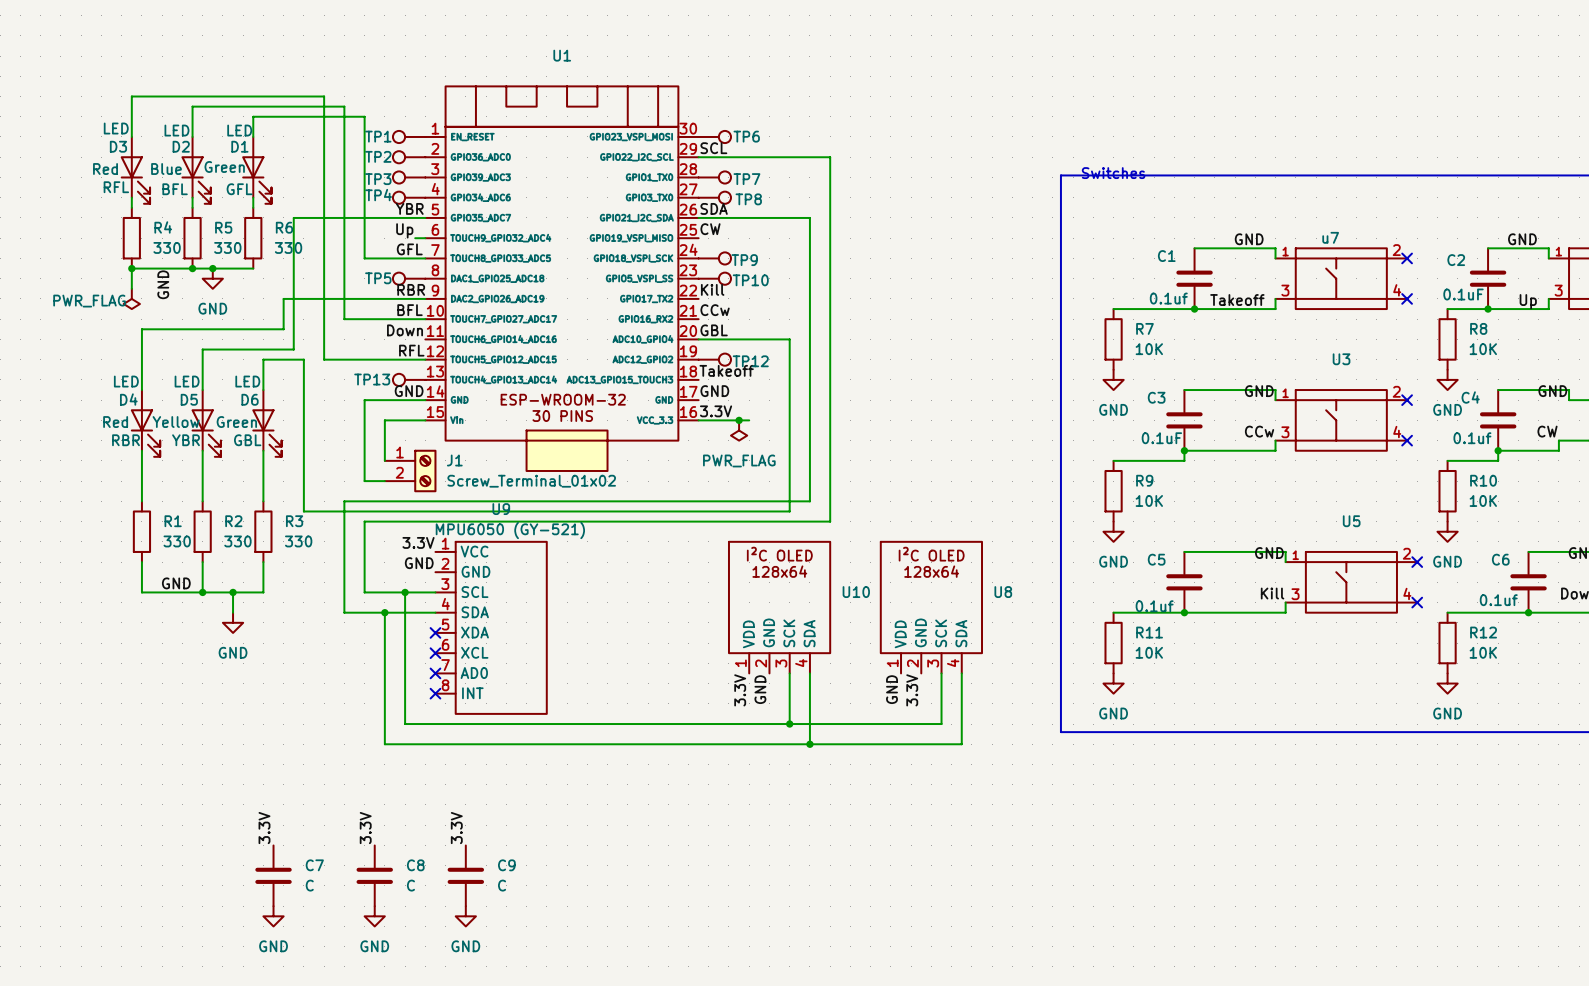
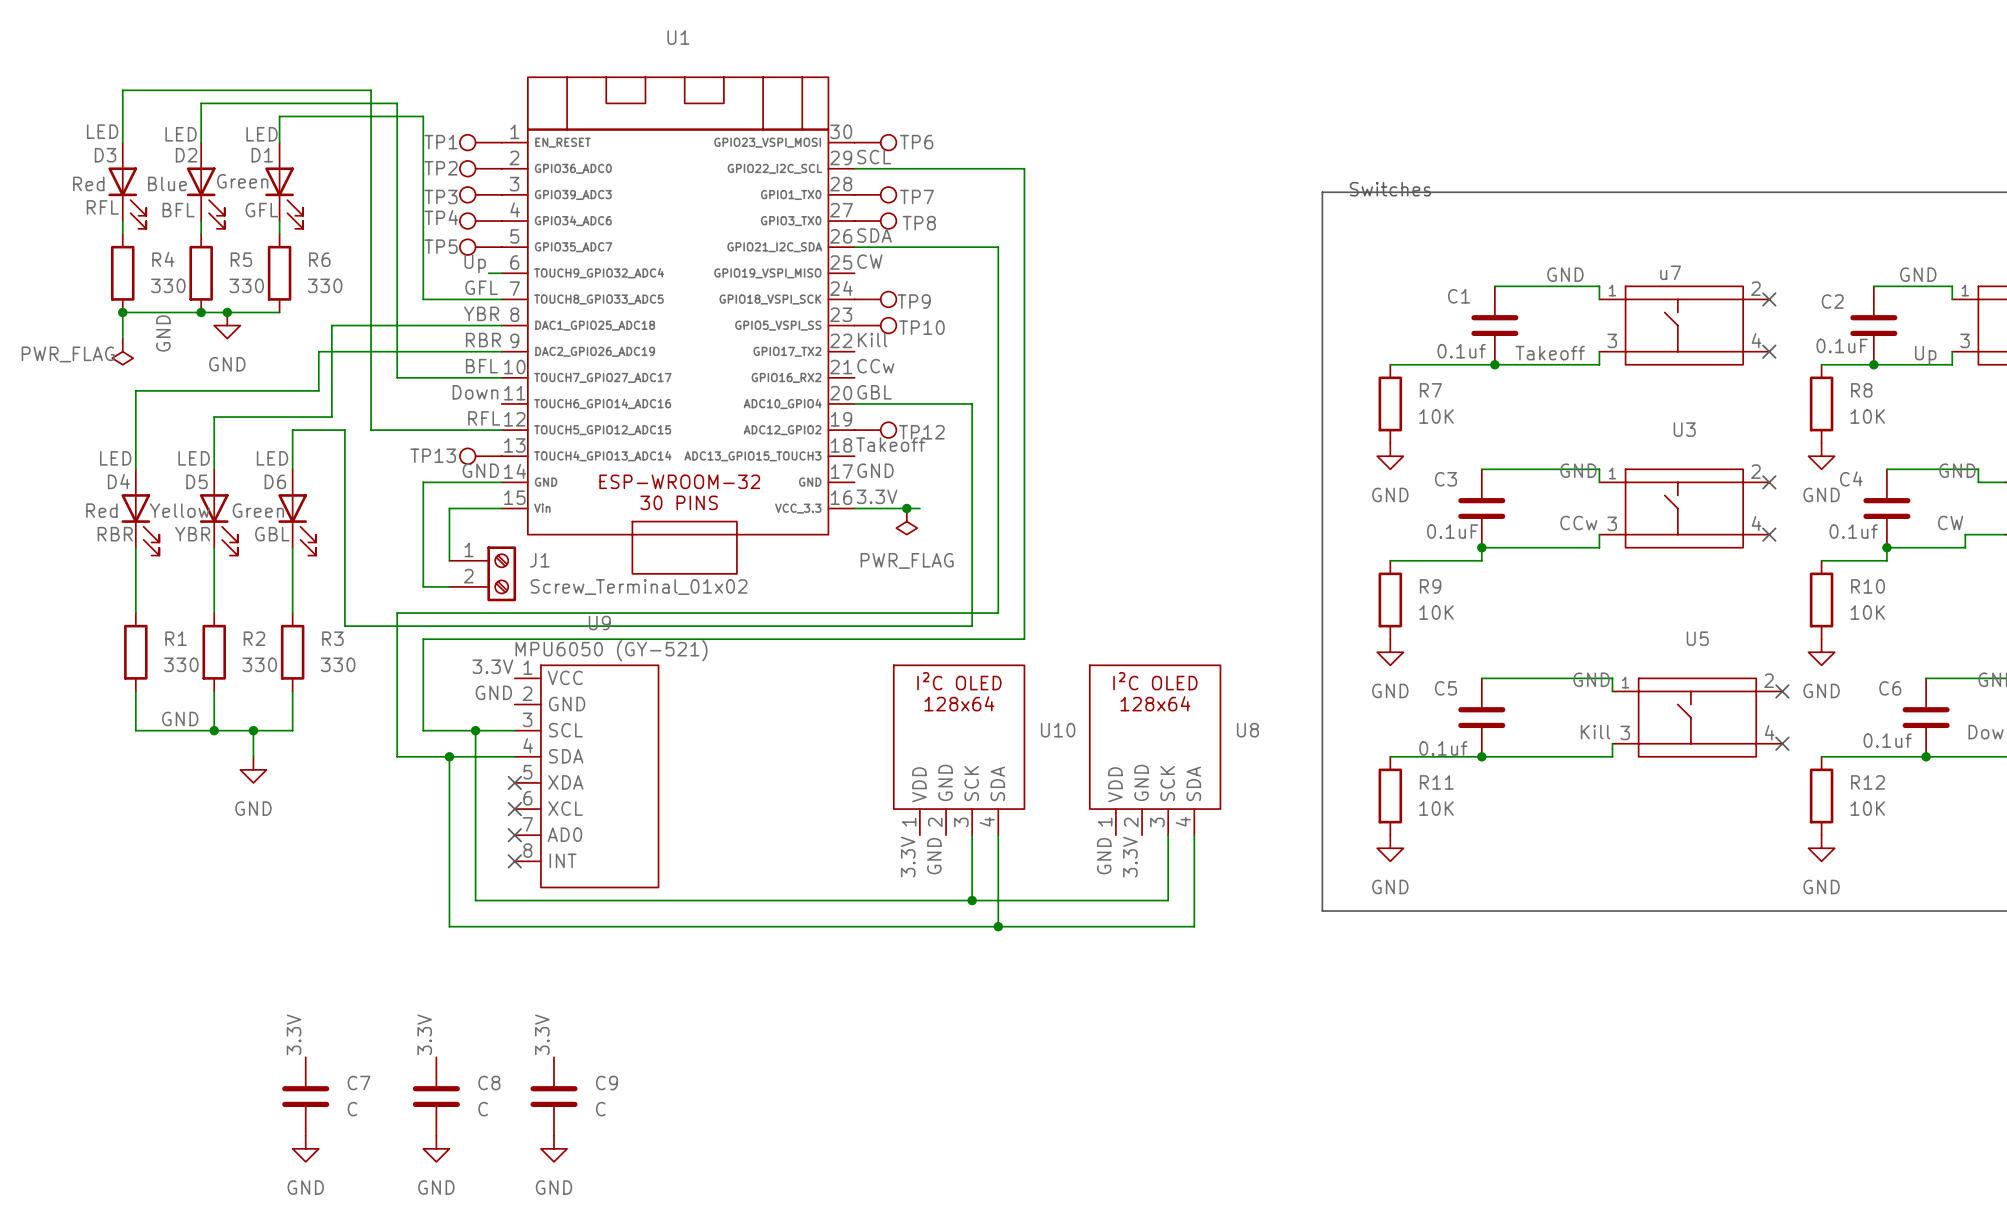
label position: YBR (409, 208) -> YBR (481, 313)
wire: (425, 217) (293, 217) (293, 278) -> (501, 325) (331, 325)
TP5 position: (409, 278) -> (480, 247)

